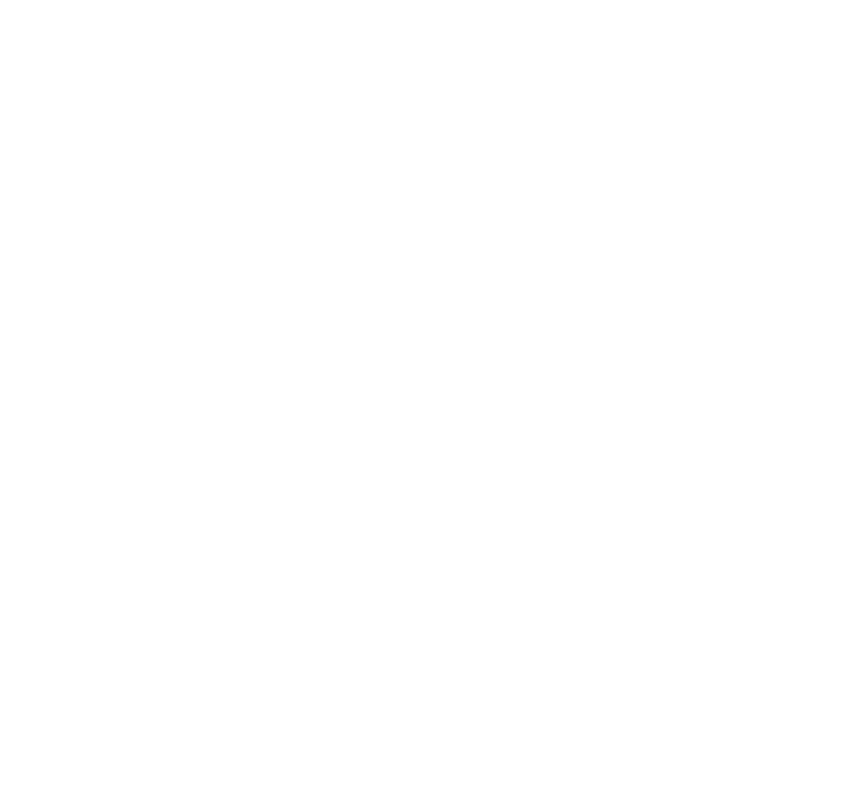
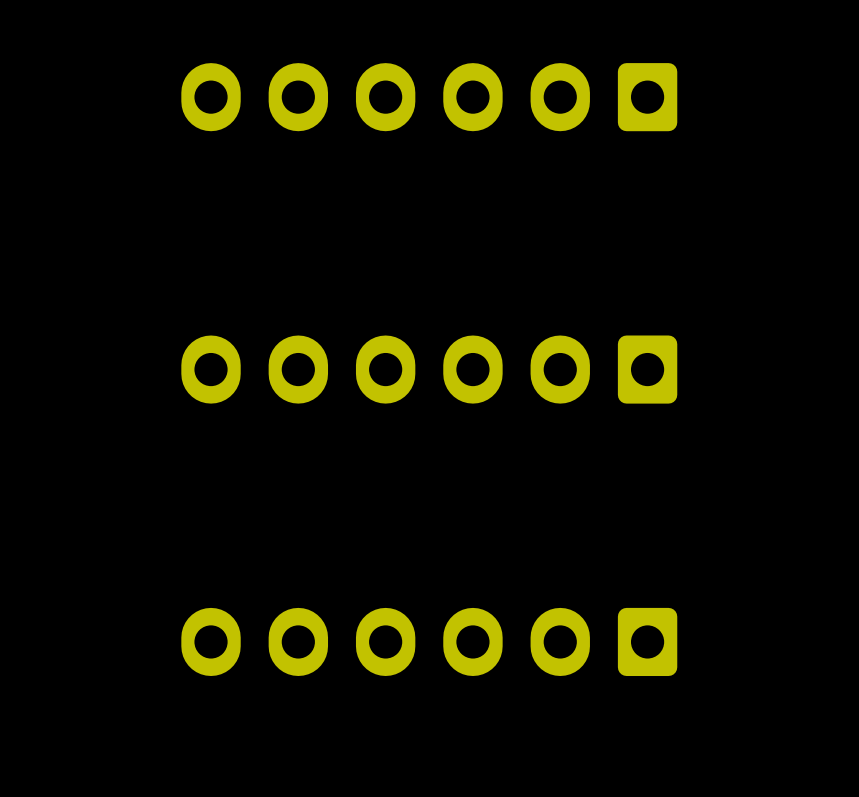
part: none -> (429, 97)
part: none -> (429, 369)
part: none -> (429, 641)

